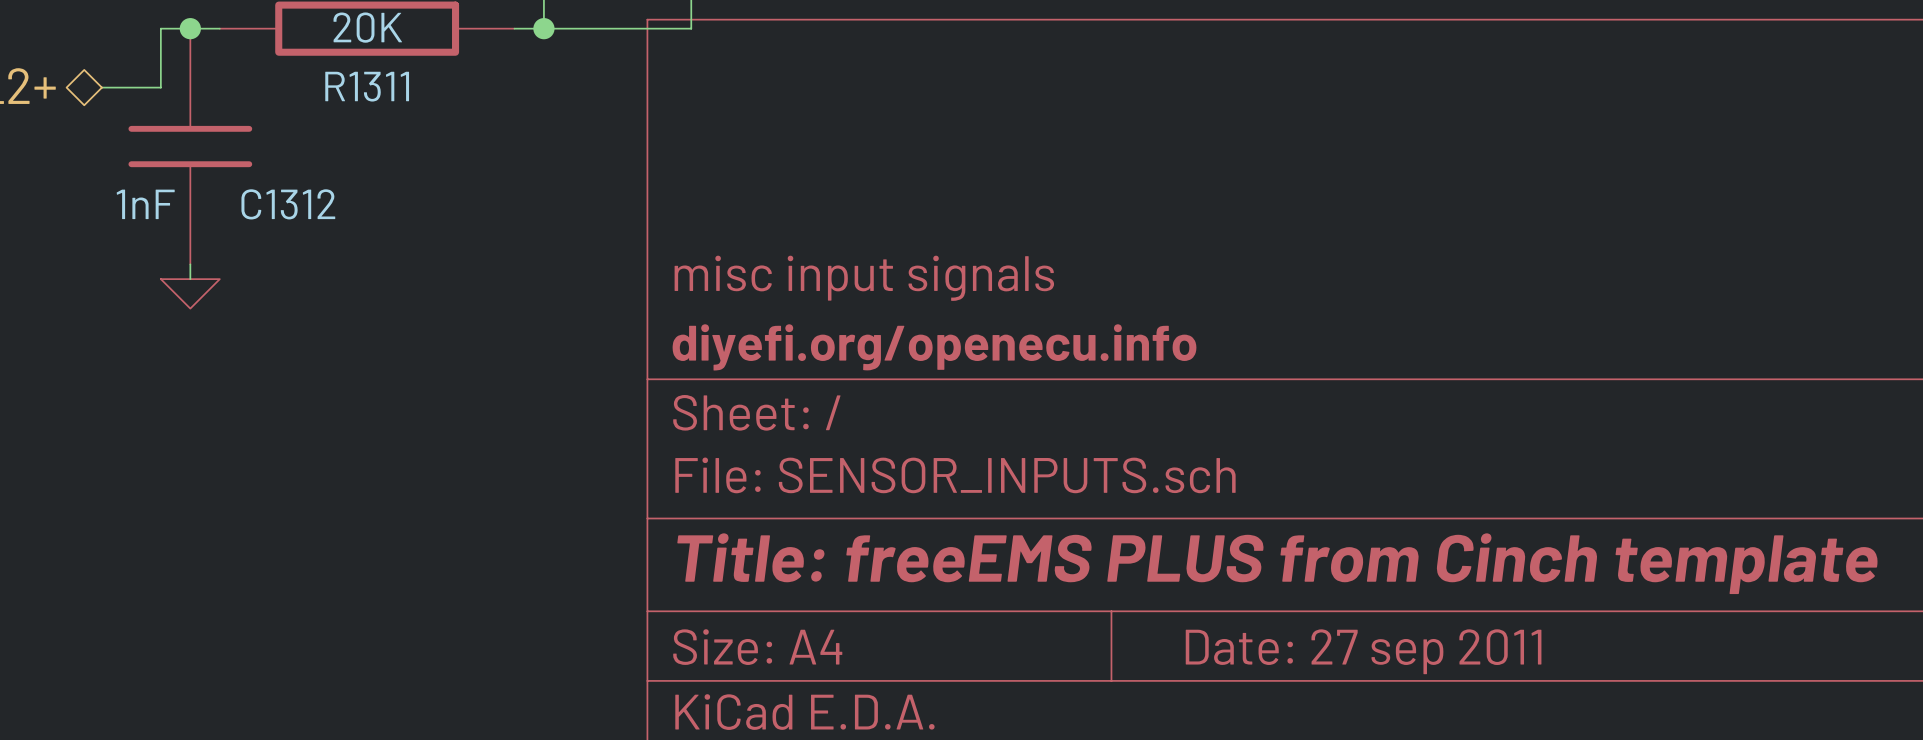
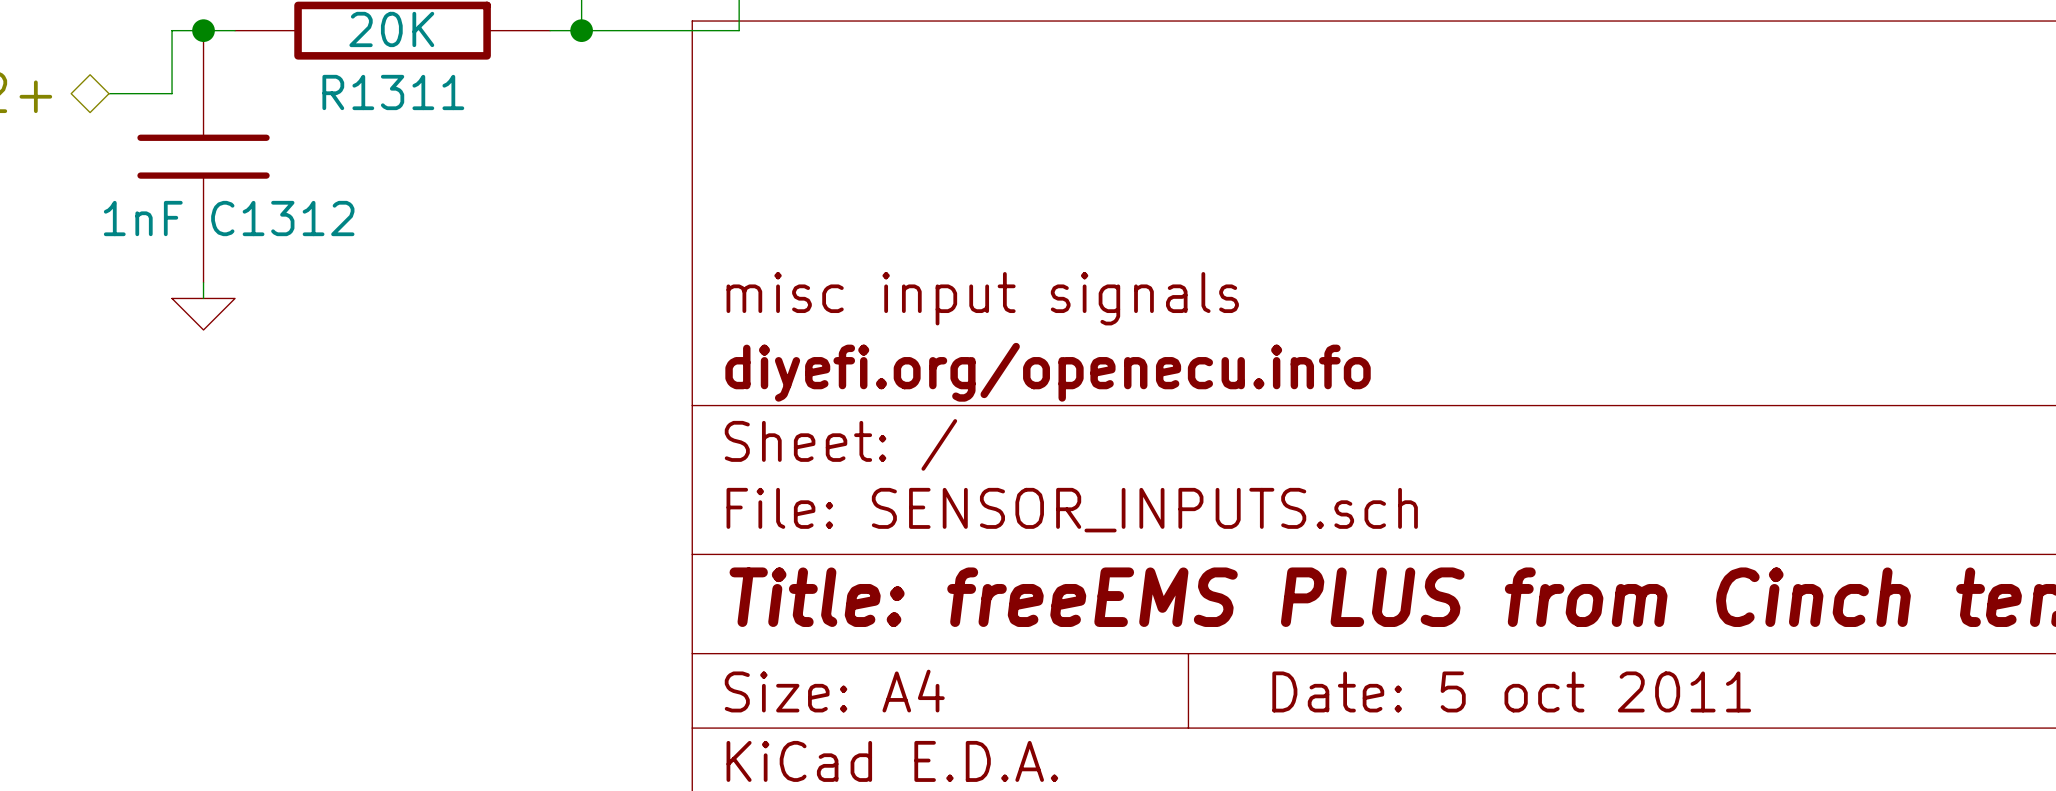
title block: Date: 27 sep 2011 (1363, 651) -> Date: 5 oct 2011 (1511, 691)

